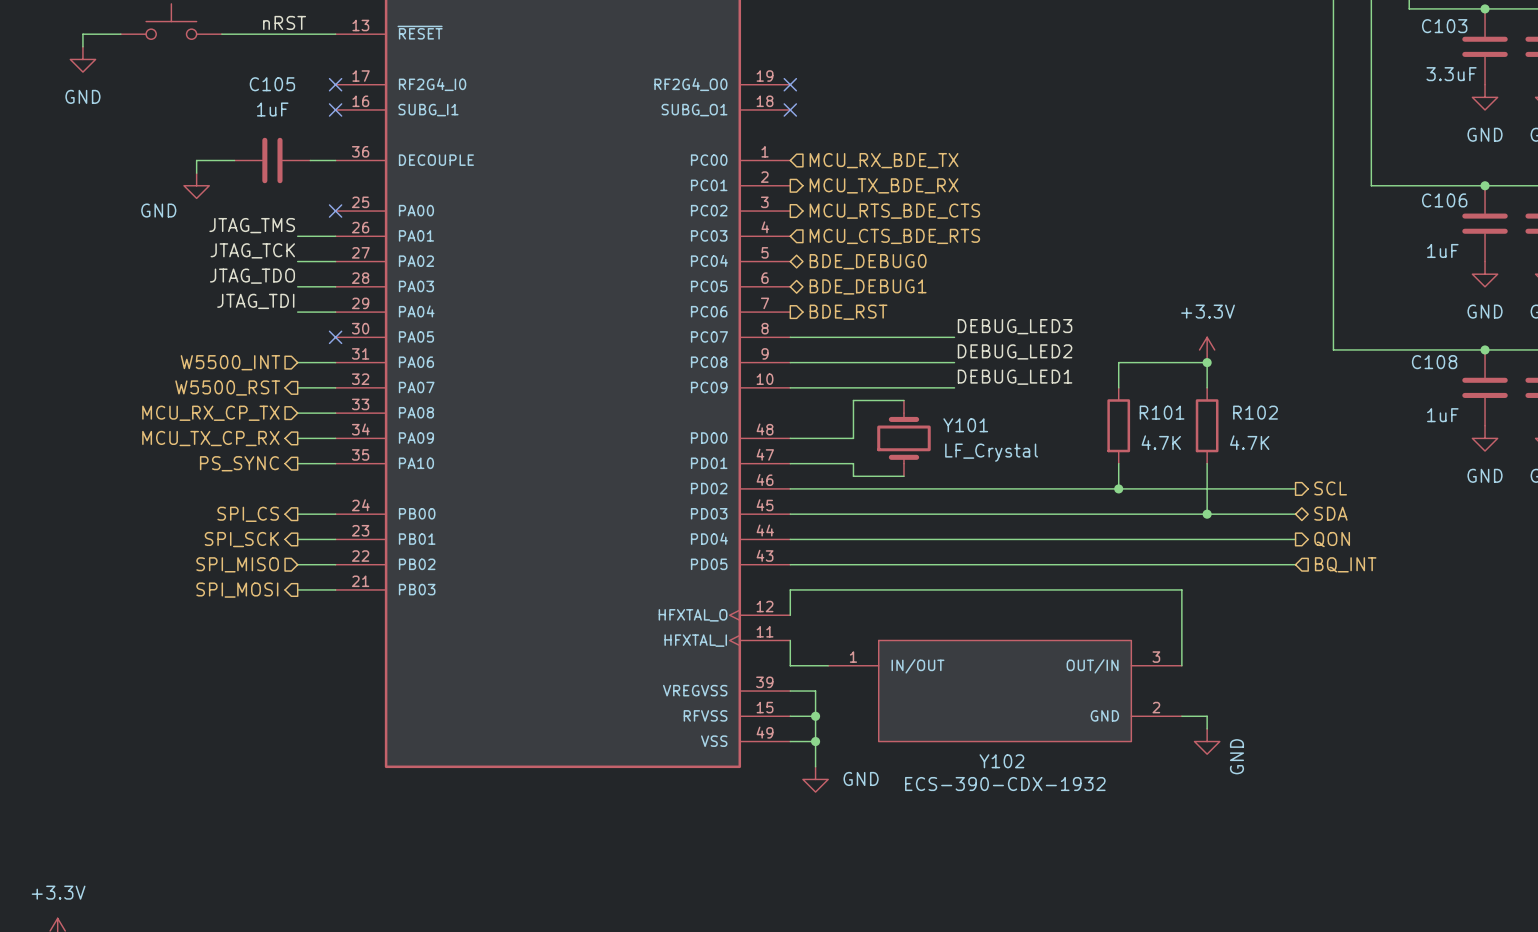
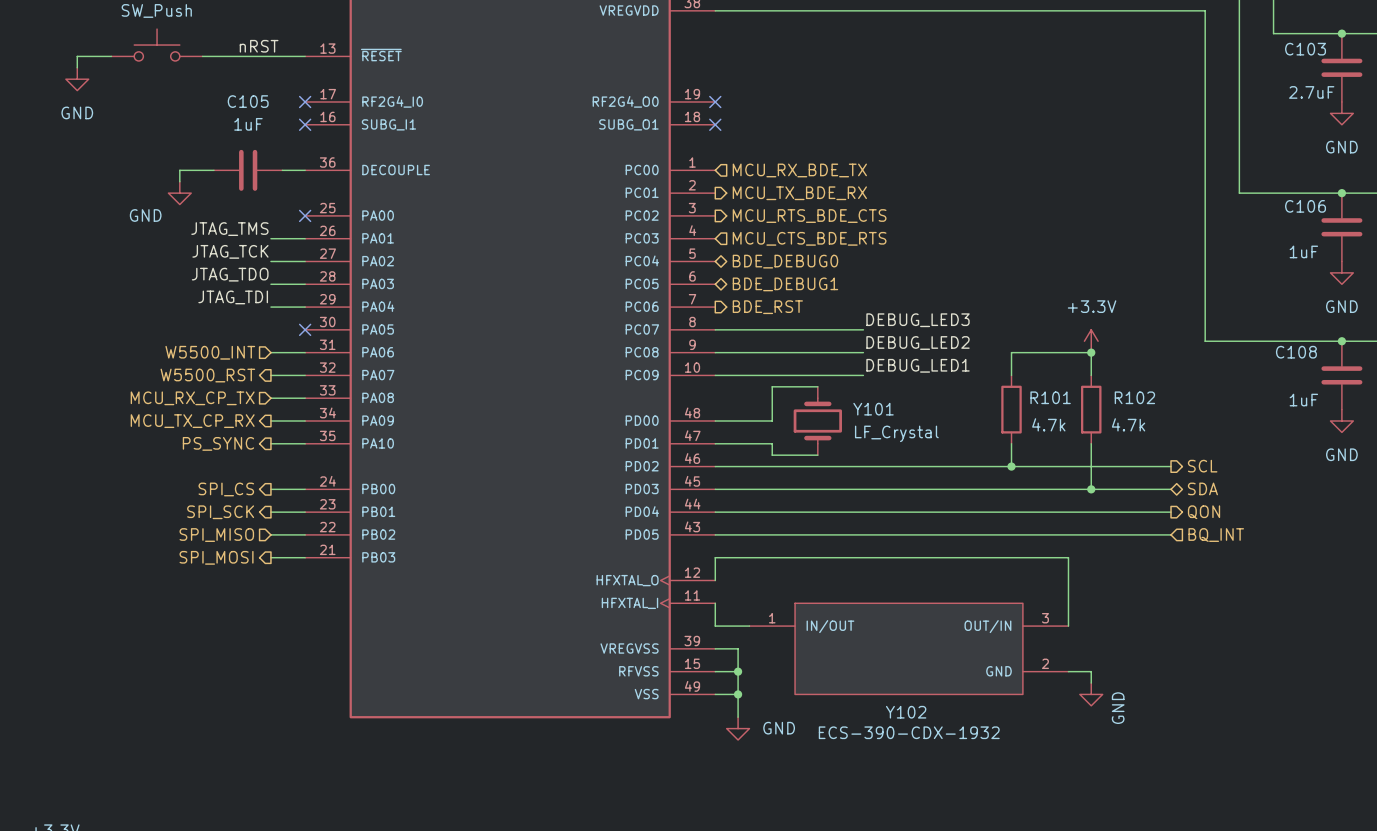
C103 value: 3.3uF (1451, 74) -> 2.7uF (1311, 92)
R101 value: 4.7K (1161, 442) -> 4.7k (1048, 424)
R102 value: 4.7K (1249, 442) -> 4.7k (1128, 424)

